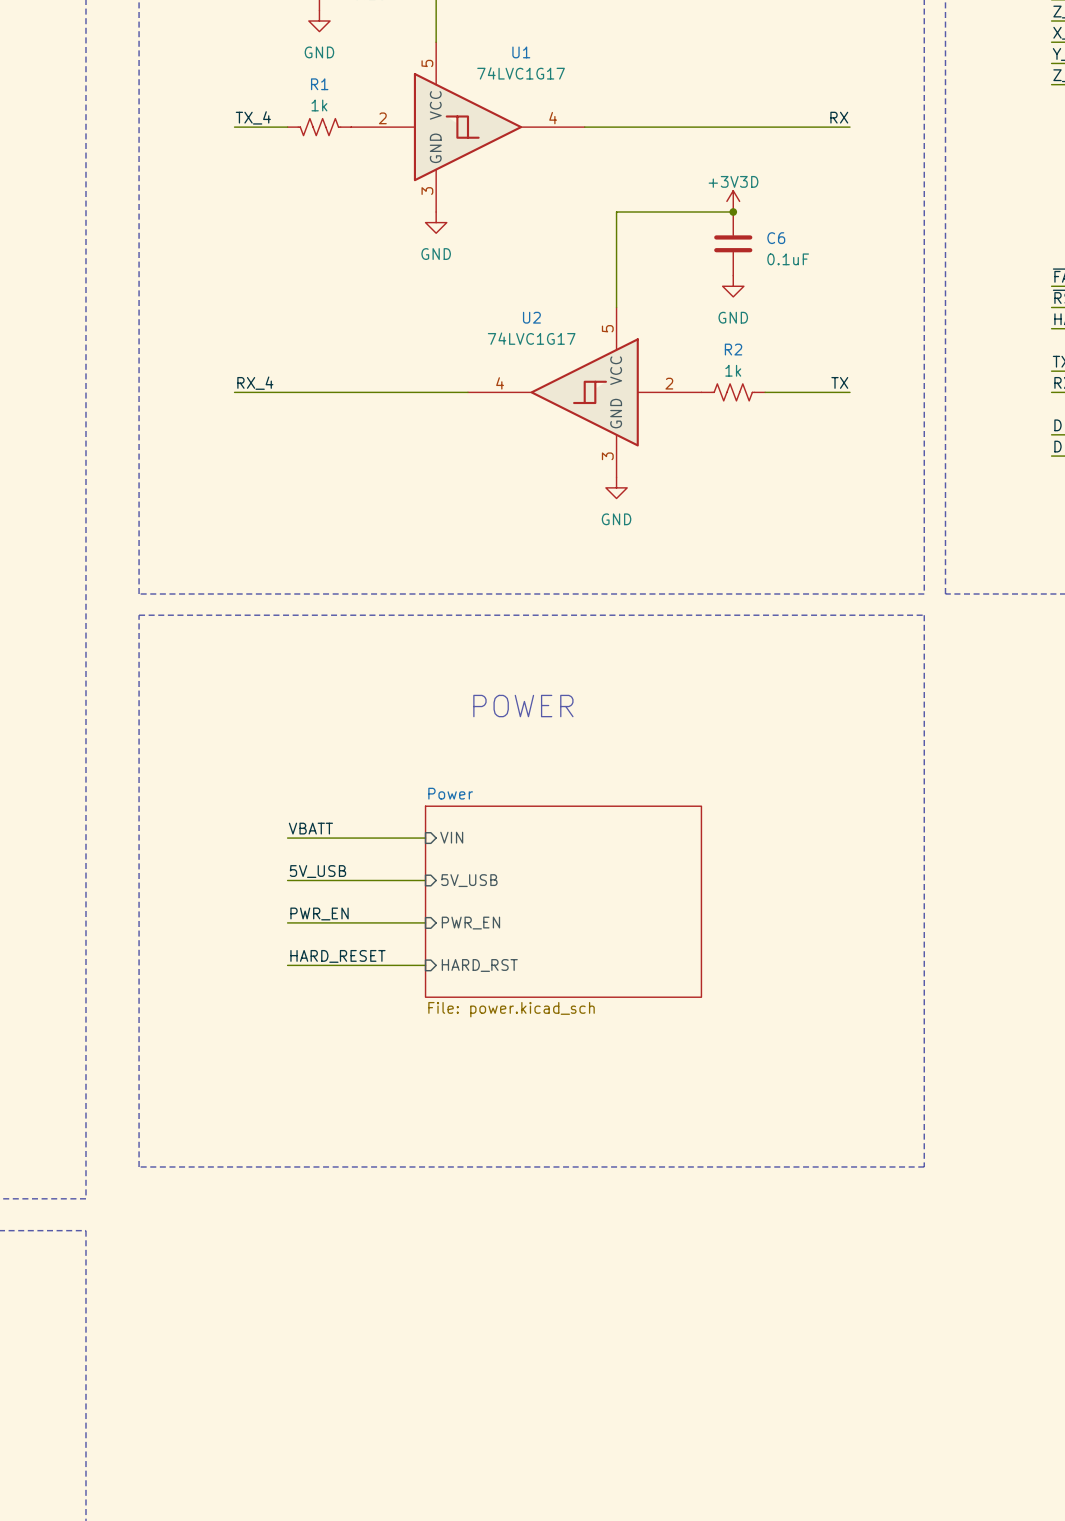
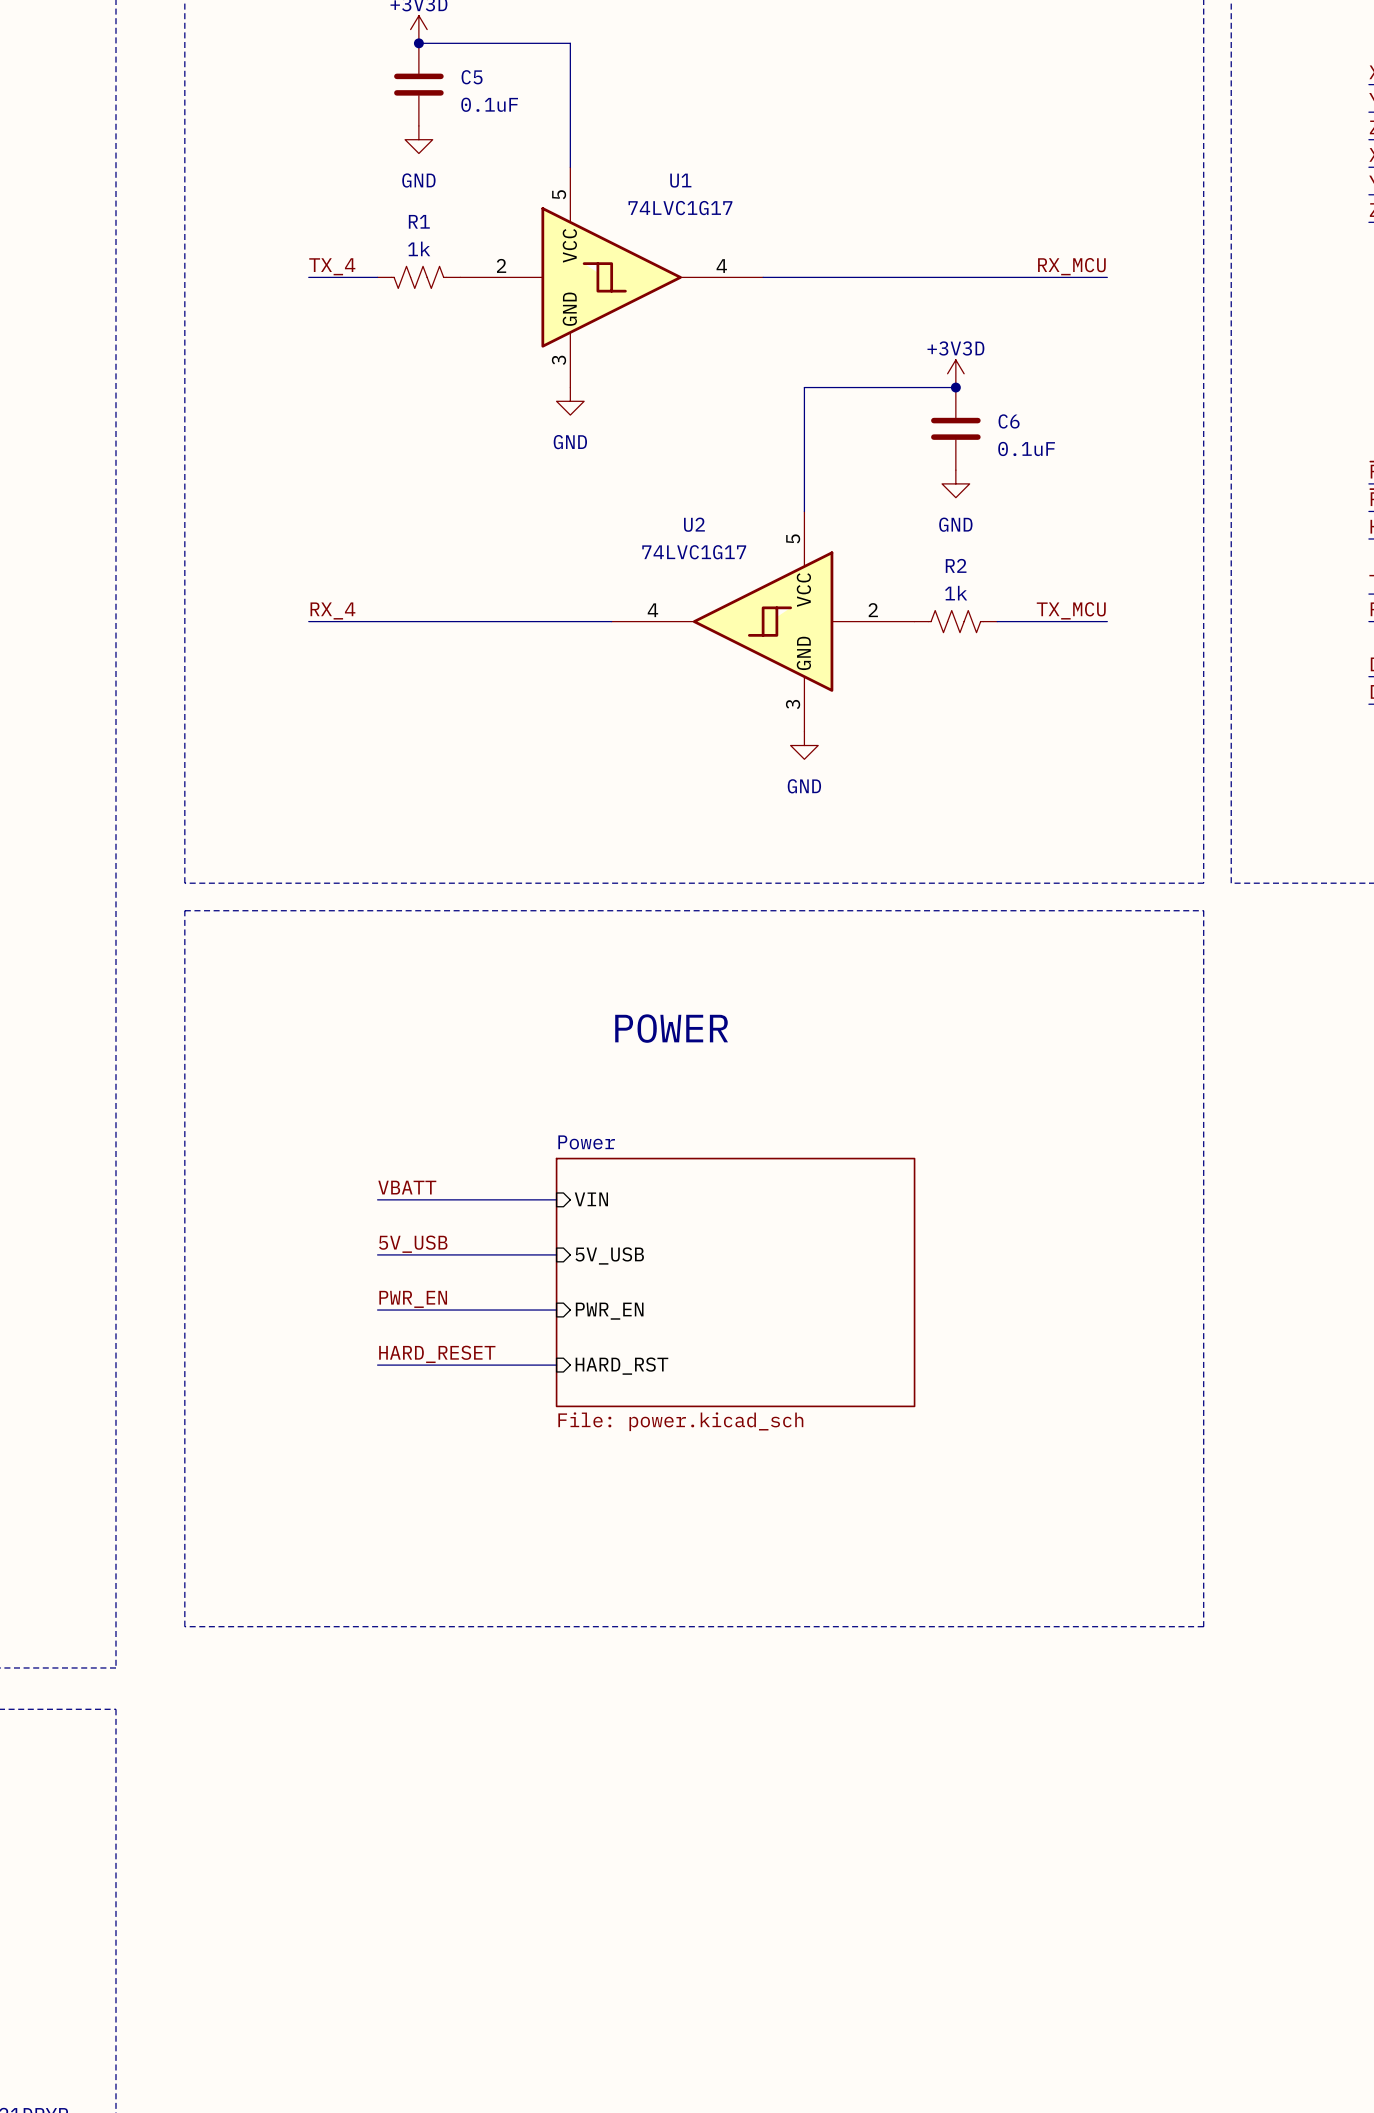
label: RX (839, 117) -> RX_MCU (1071, 266)
label: TX (839, 382) -> TX_MCU (1071, 610)

